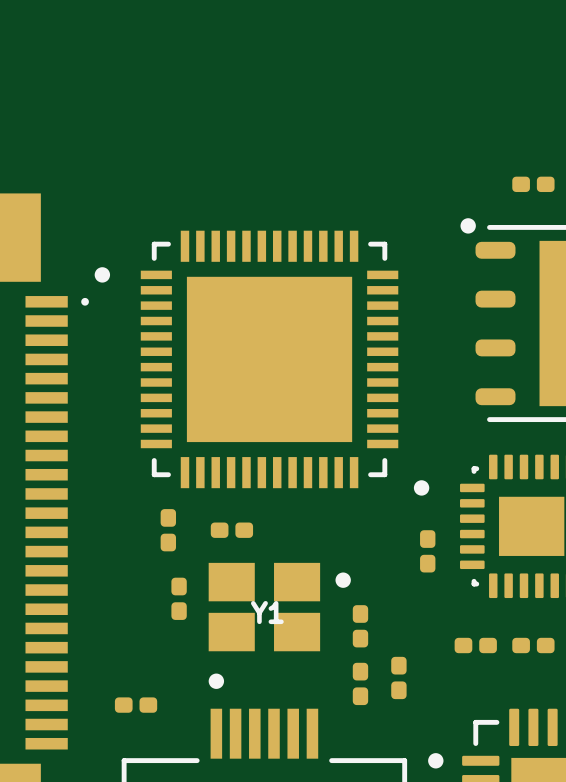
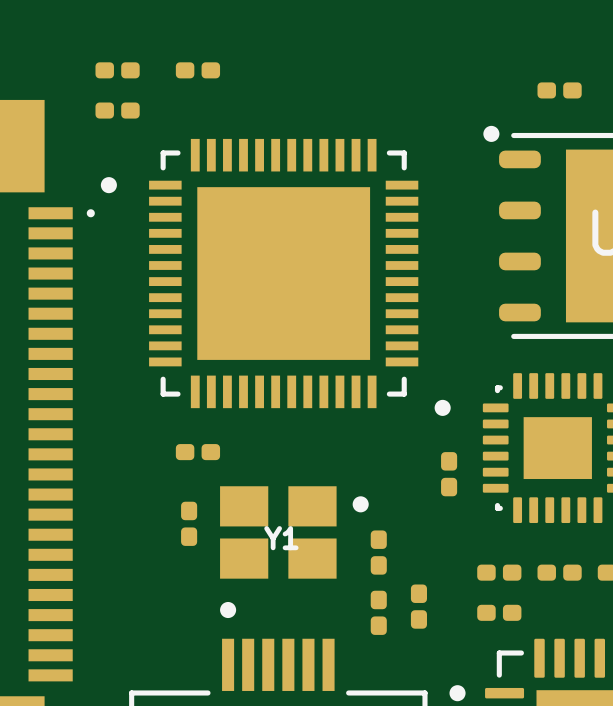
part: none -> (117, 70)
part: none -> (197, 70)
part: none -> (117, 110)
part rotation: 0° (168, 530) -> 90° clockwise (197, 452)
part: (231, 530) -> none
part: none -> (499, 612)
part: (136, 705) -> none

